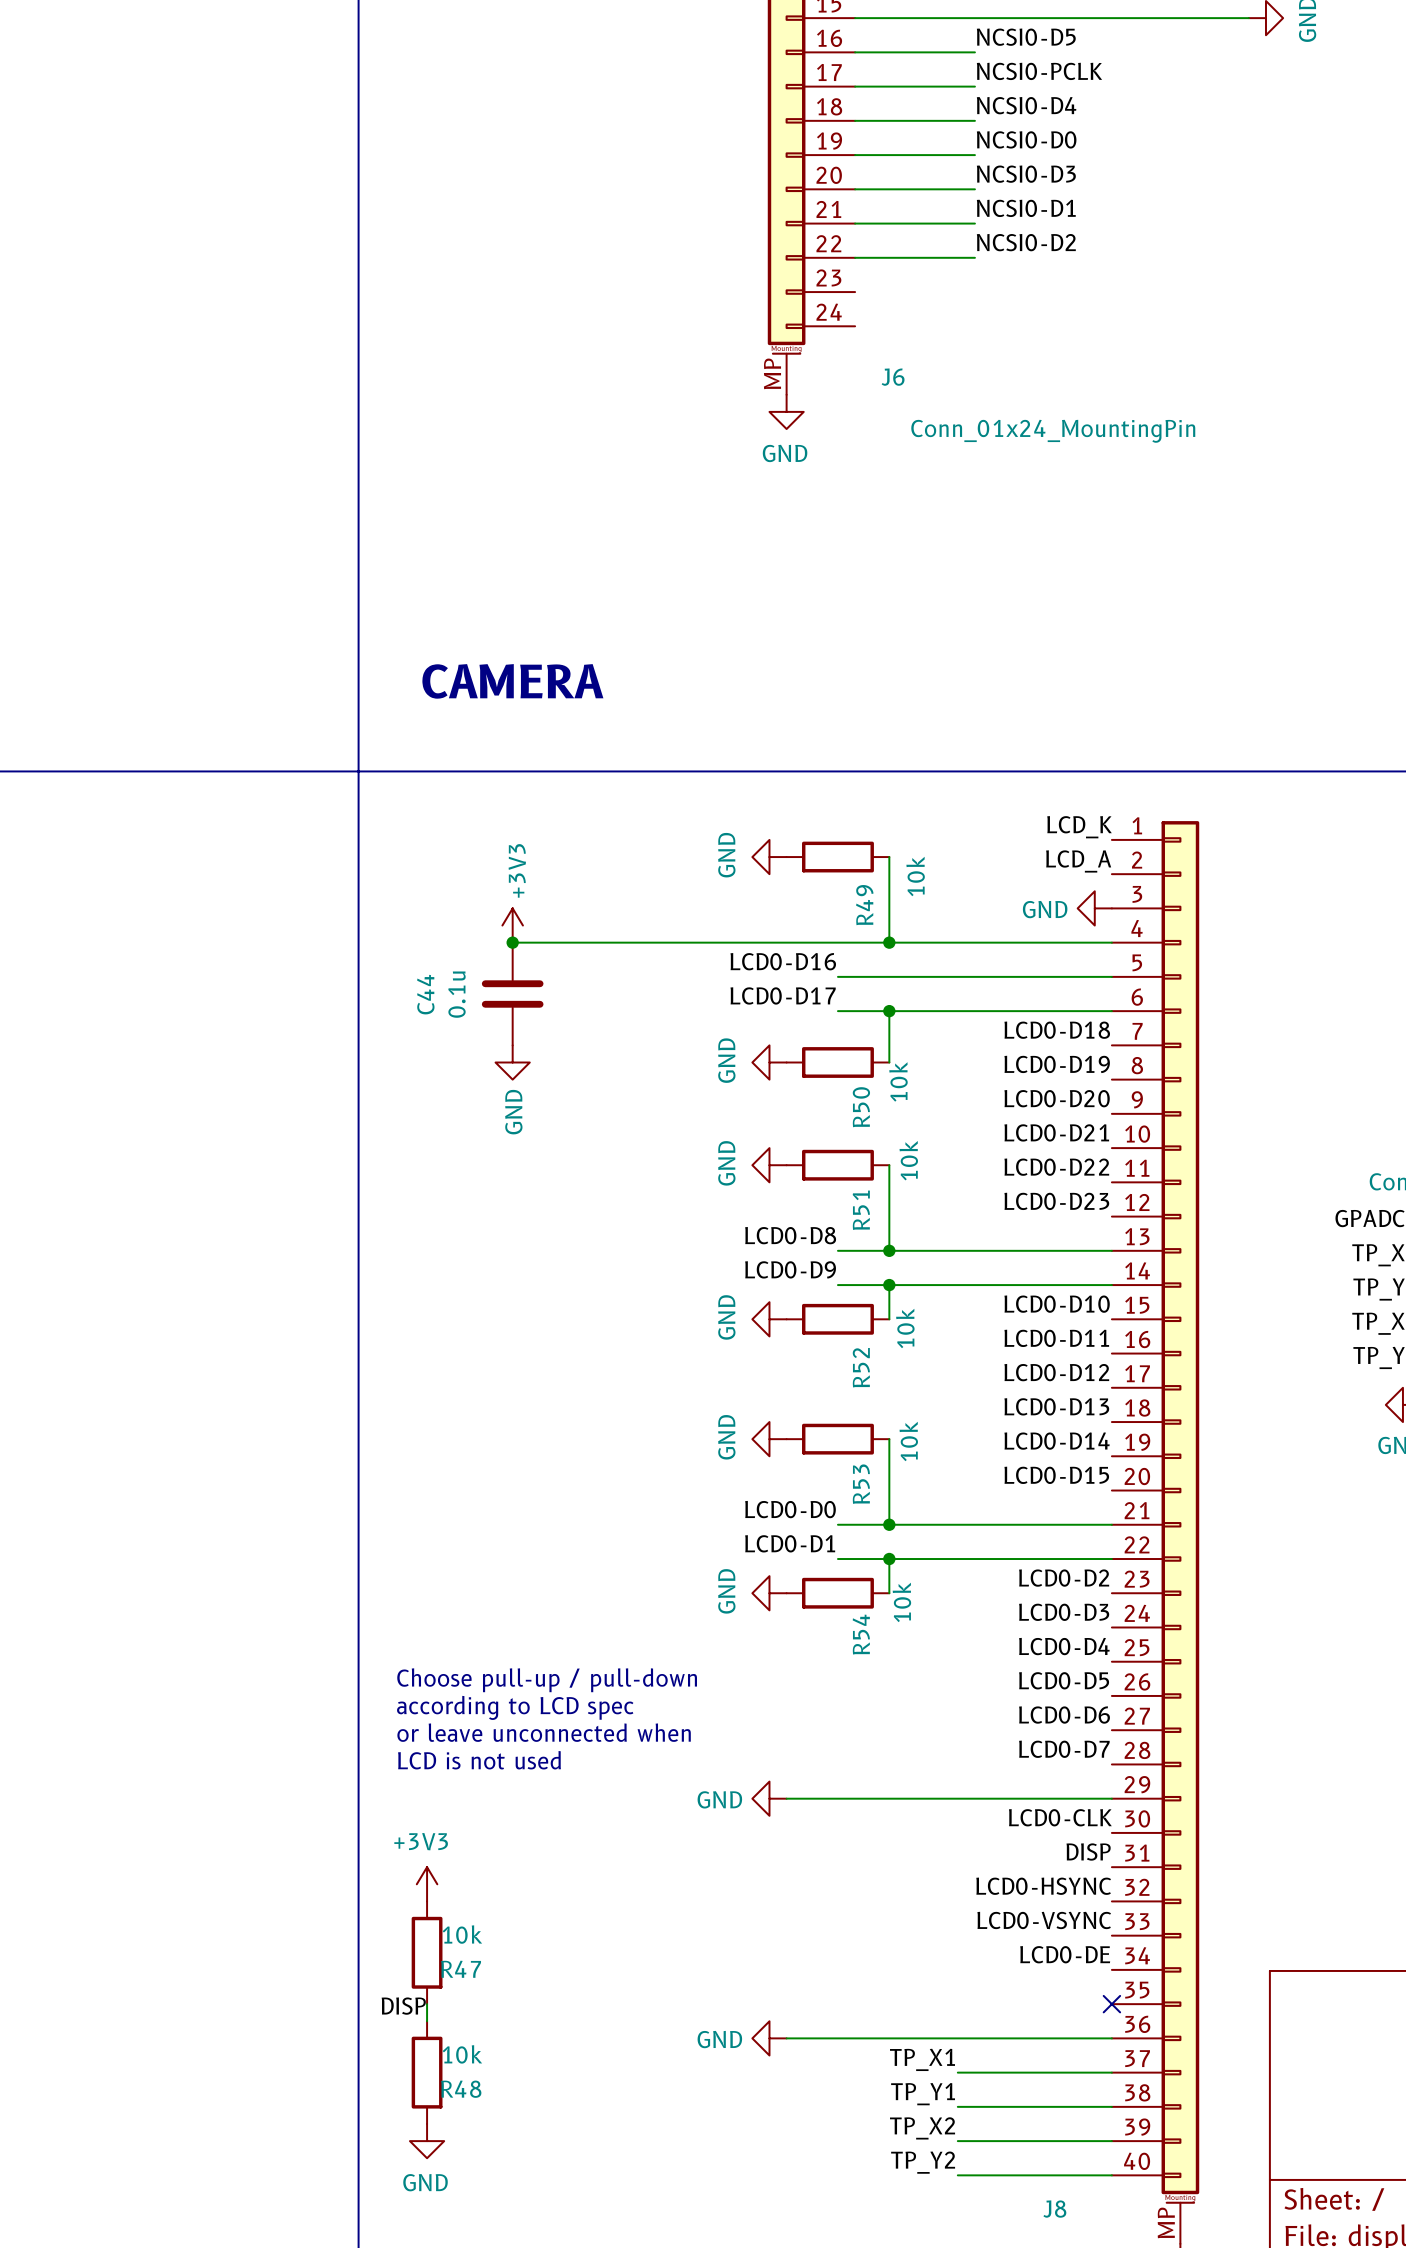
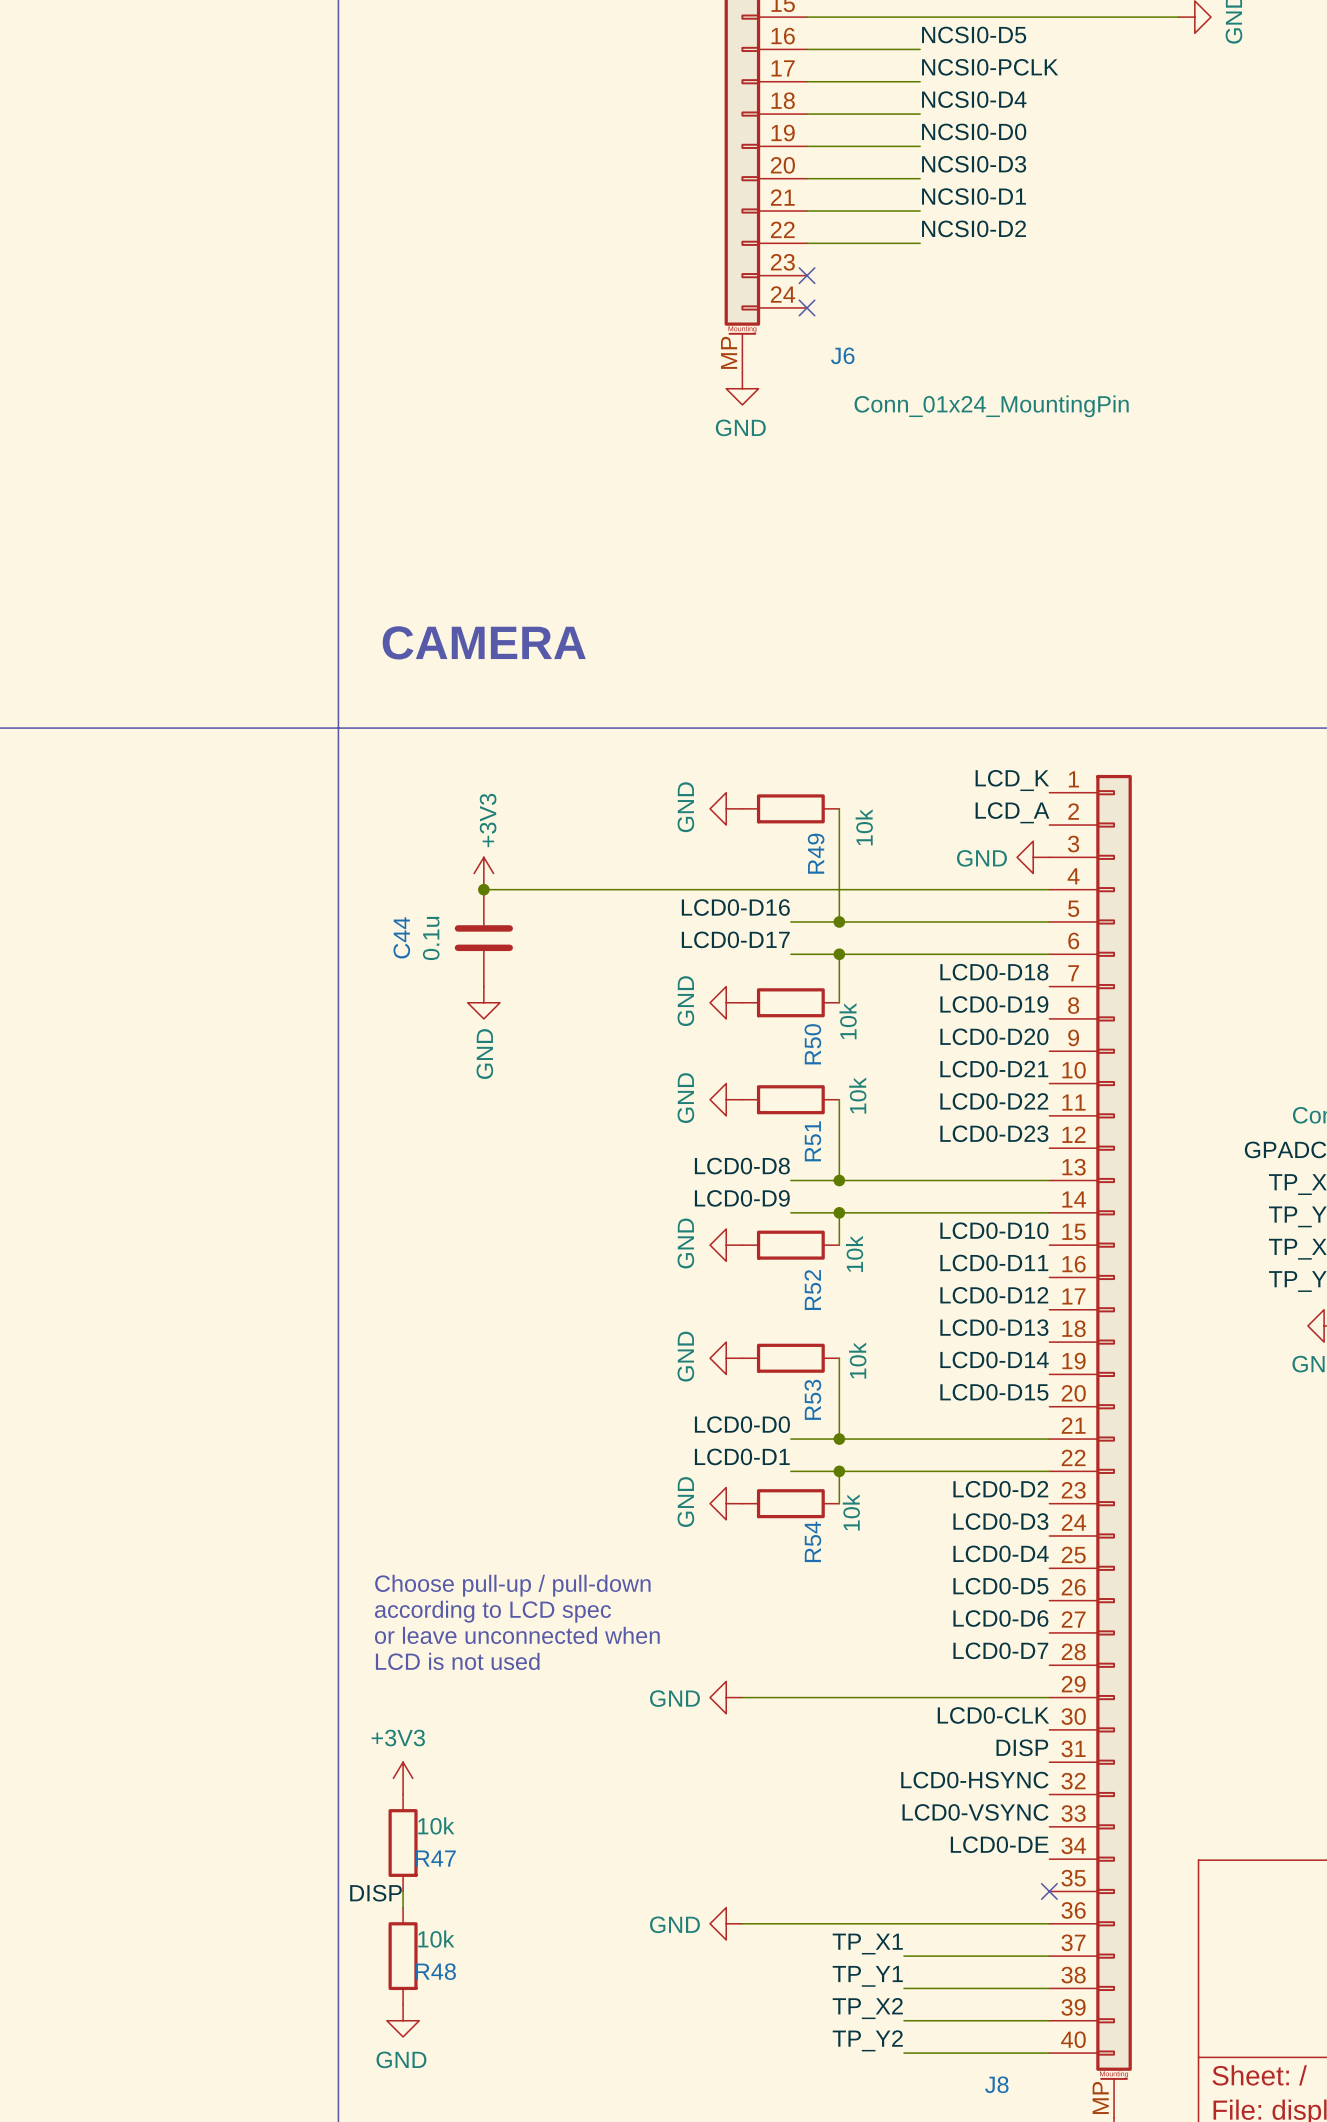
no-connect mark: none -> (807, 275)
no-connect mark: none -> (807, 307)
wire: none -> (839, 889) (839, 921)
junction position: (889, 942) -> (839, 921)

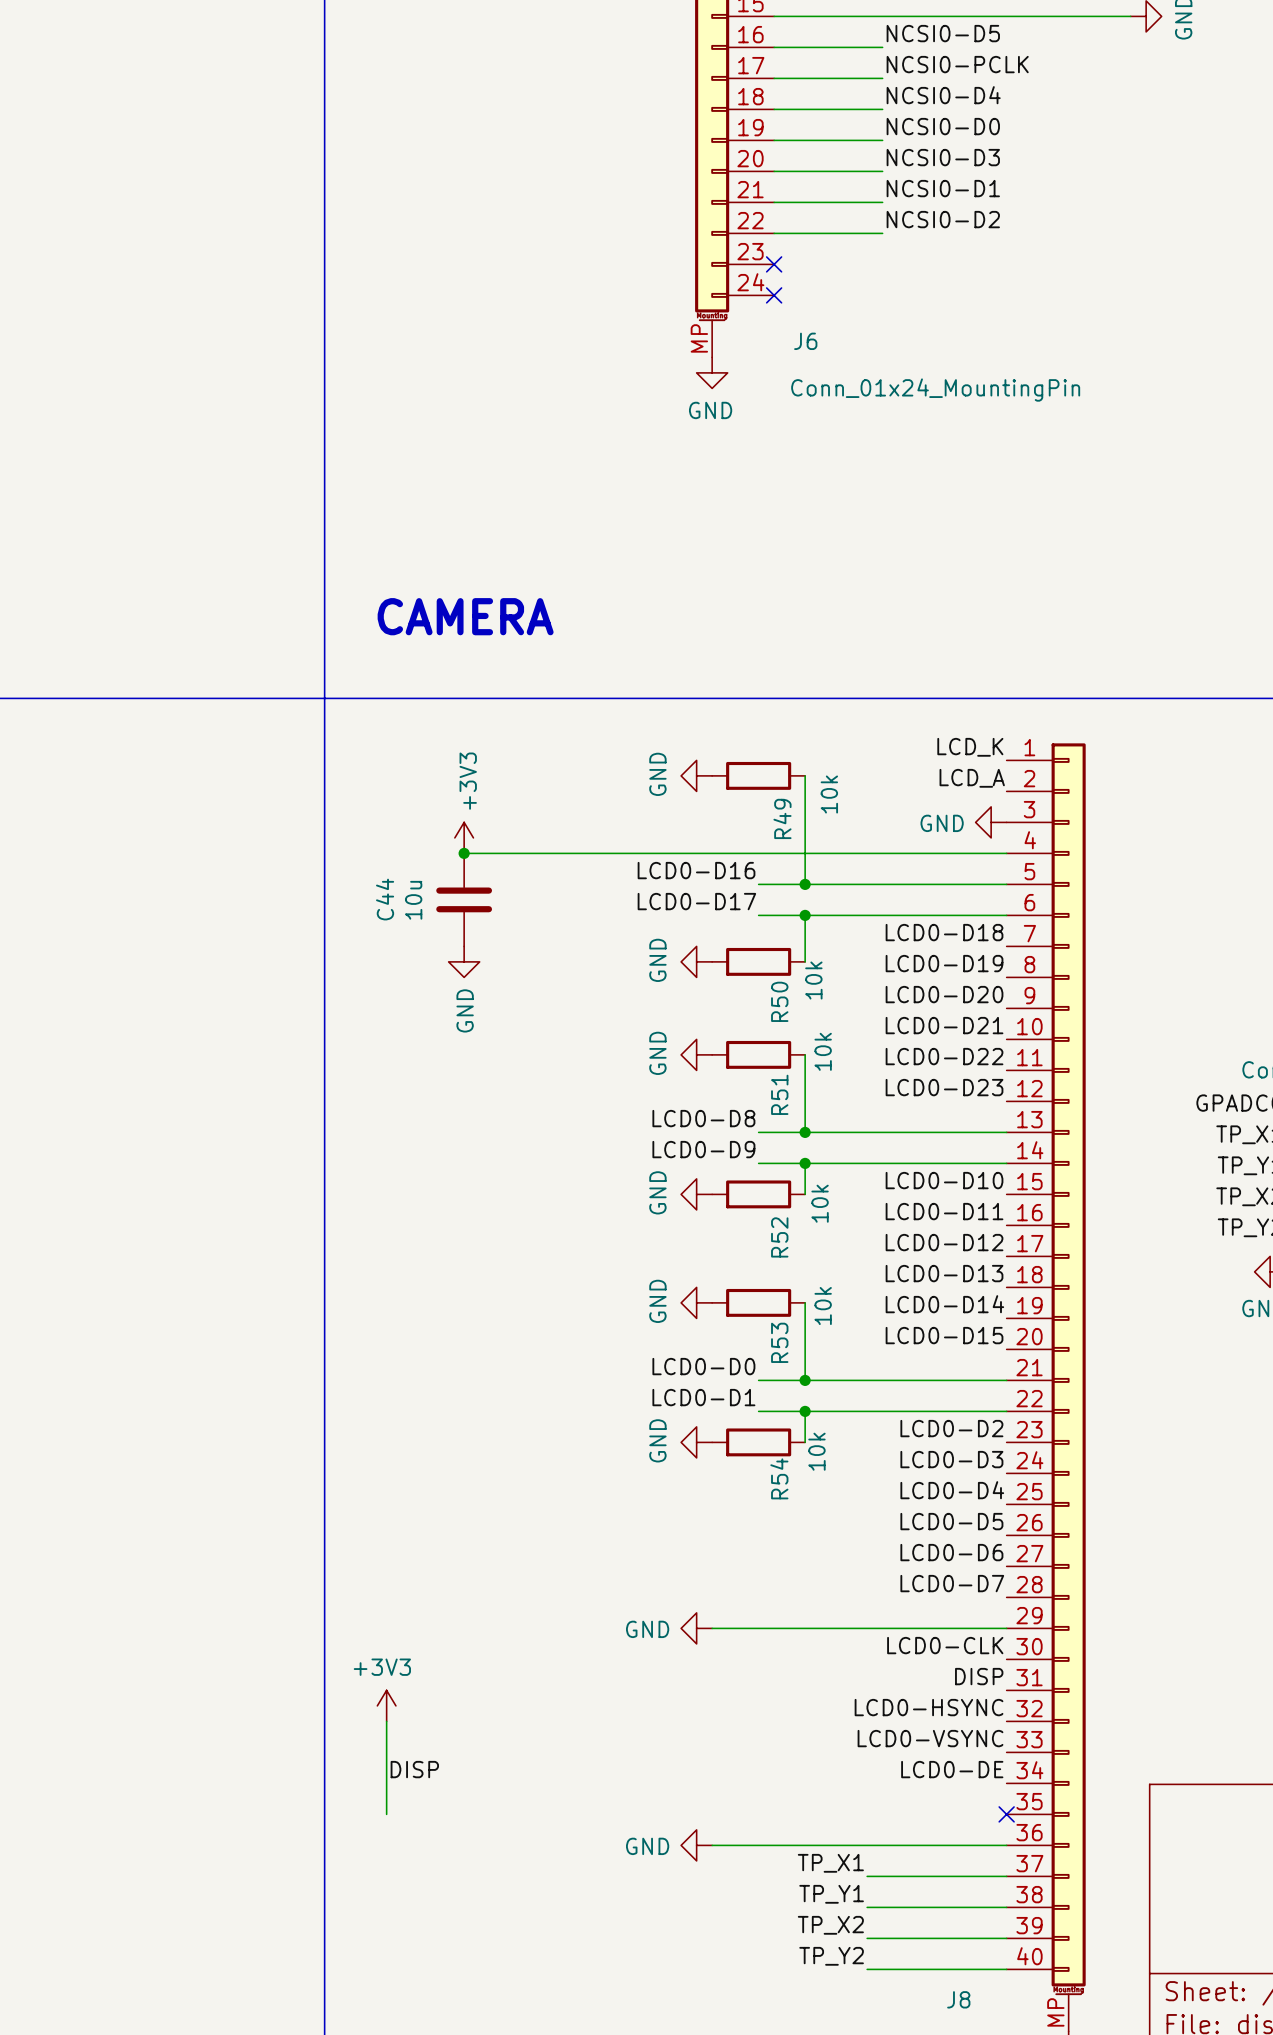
C44 value: 0.1u (431, 938) -> 10u (413, 900)
text: Choose pull-up / pull-down (512, 1585) -> none
text: according to LCD spec (492, 1611) -> none
text: or leave unconnected when (517, 1635) -> none
text: LCD is not used (457, 1661) -> none
R47: 10k (403, 1843) -> none
wire: (403, 1891) (403, 1907) -> (386, 1814) (386, 1721)
label position: DISP (375, 1893) -> DISP (414, 1769)
R48: 10k (403, 1956) -> none
power symbol: GND (403, 2020) -> none

